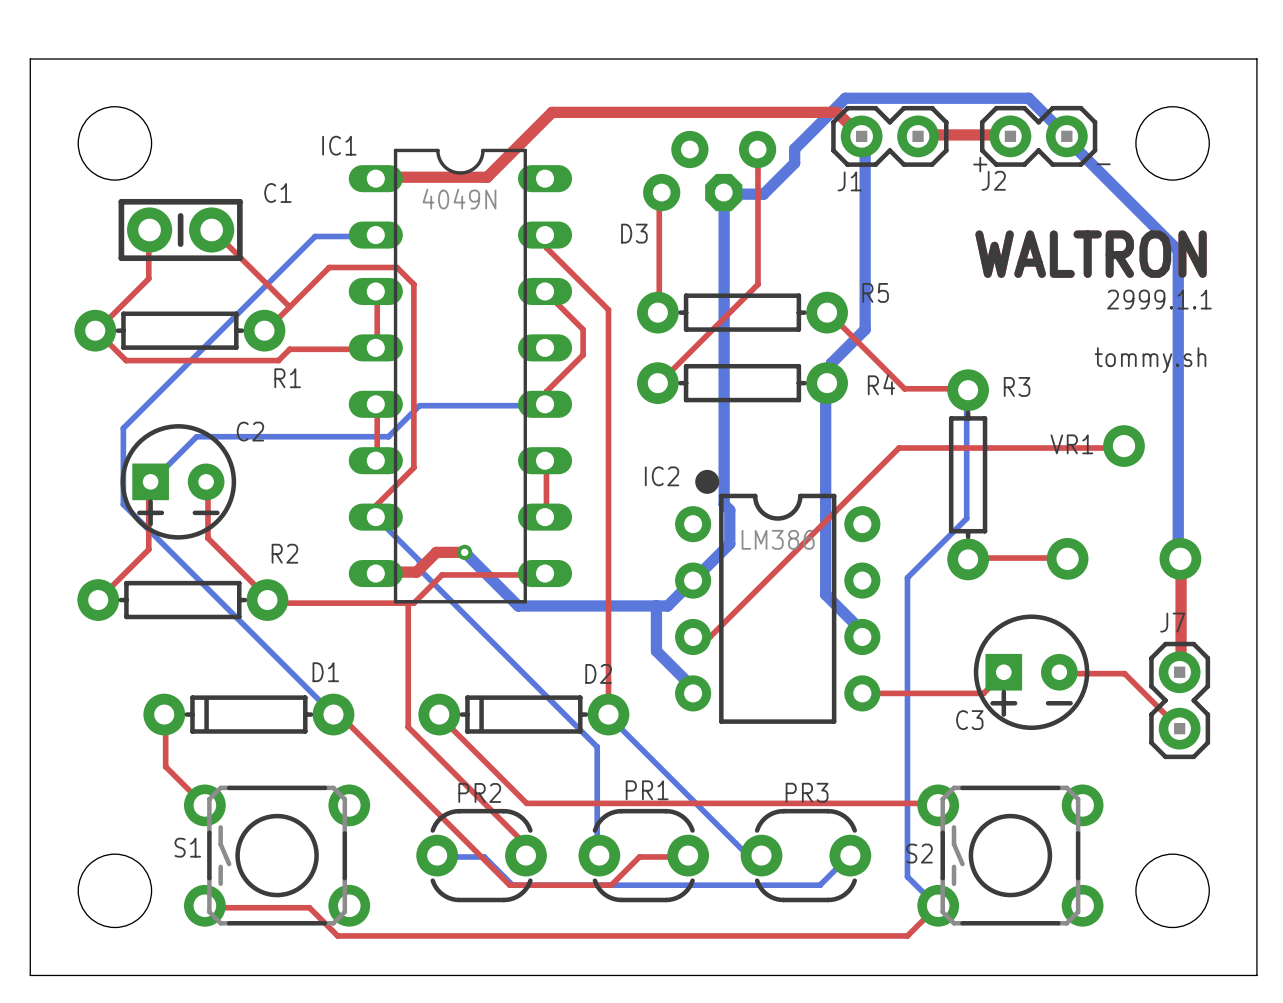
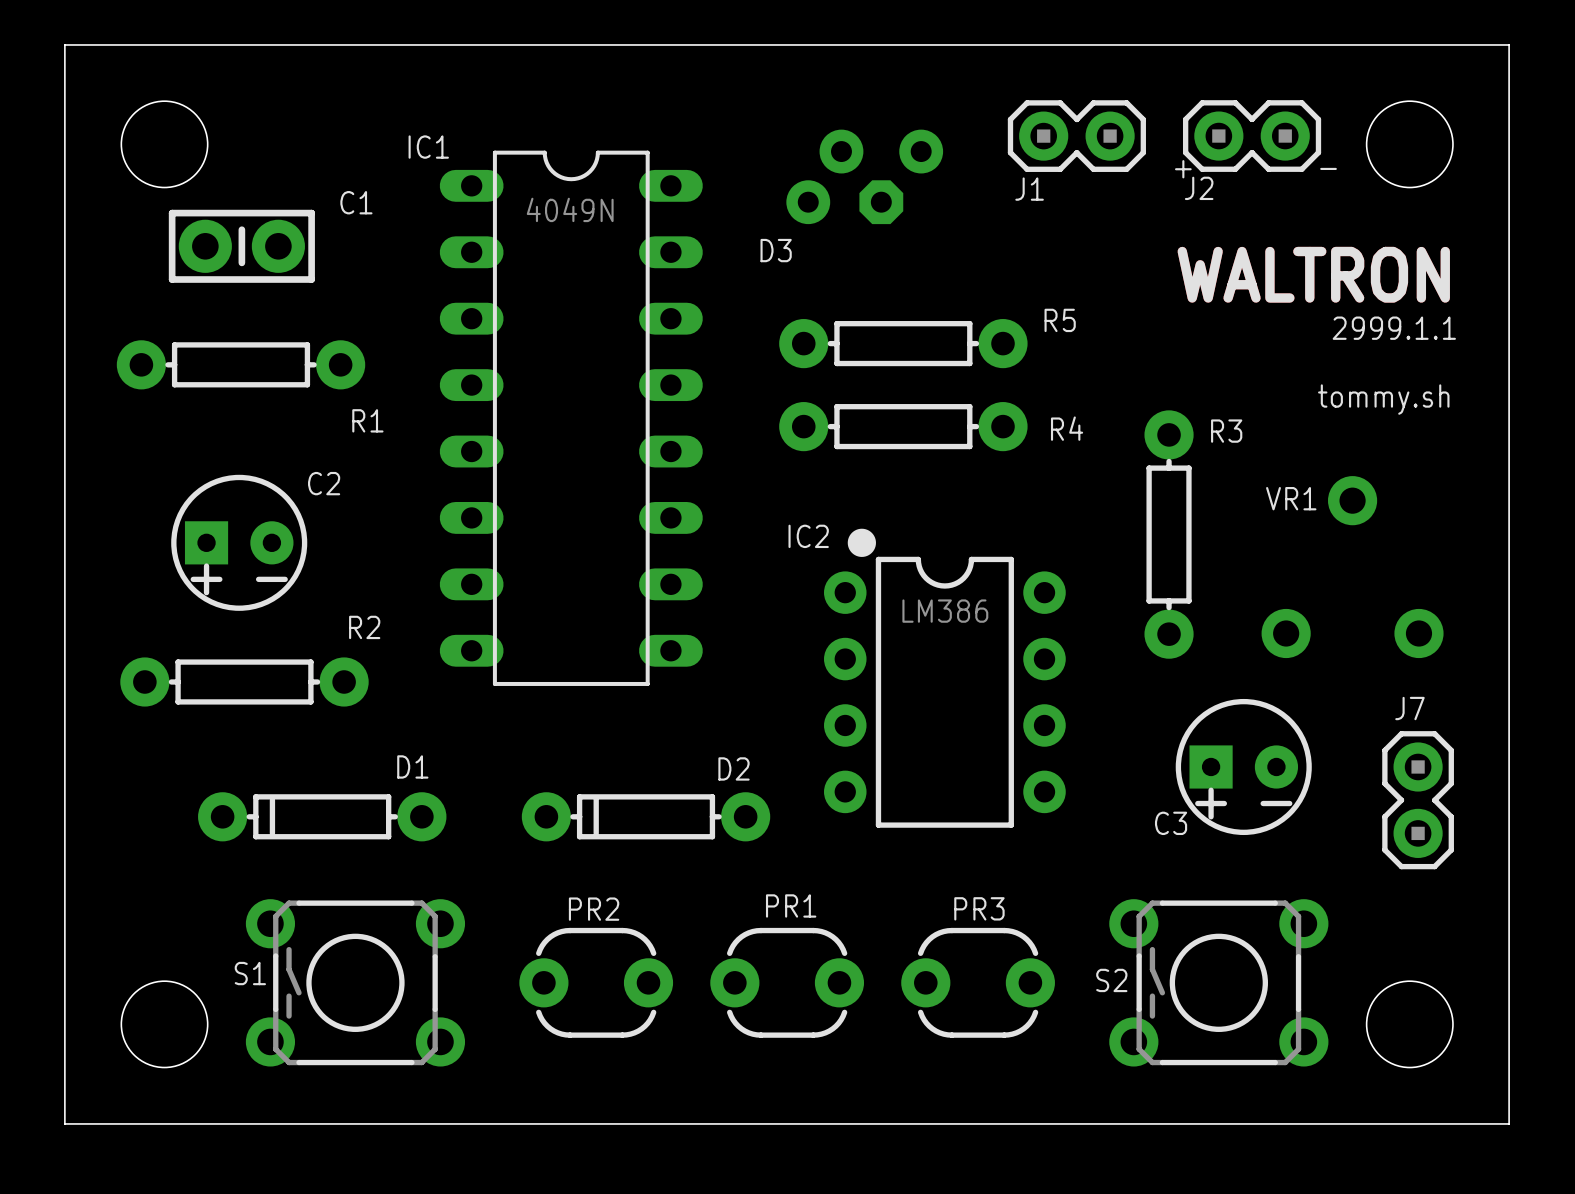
top track: (861, 136) (836, 112) (552, 112) (487, 177) (375, 178) -> none
bottom track: (861, 136) (865, 140) (865, 329) (831, 363) (831, 380) (825, 383) (825, 594) (862, 631) (862, 636) -> none
top track: (918, 136) (1010, 136) -> none
top track: (757, 149) (757, 284) (657, 383) -> none
top track: (661, 192) (659, 194) (657, 312) -> none
top track: (149, 230) (148, 278) (95, 330) (126, 360) (278, 360) (289, 349) (374, 349) (377, 346) (375, 291) -> none
top track: (211, 230) (289, 306) -> none
bottom track: (375, 235) (315, 236) (123, 428) (123, 504) (333, 714) -> none
top track: (545, 235) (546, 247) (608, 309) (608, 714) -> none
top track: (545, 291) (583, 329) (583, 354) (546, 391) (545, 404) -> none
top track: (827, 312) (904, 388) (968, 390) -> none
top track: (264, 330) (329, 267) (396, 267) (413, 284) (413, 467) (377, 504) (375, 517) -> none
bottom track: (968, 390) (966, 518) (907, 577) (907, 876) (938, 905) -> none
top track: (375, 404) (375, 460) -> none
bottom track: (545, 404) (419, 405) (388, 436) (196, 436) (150, 481) -> none
top track: (1123, 446) (1121, 448) (899, 448) (710, 636) (693, 636) -> none
top track: (545, 460) (545, 517) -> none
top track: (150, 481) (148, 481) (148, 549) (98, 600) -> none
top track: (206, 481) (207, 481) (207, 538) (267, 597) (267, 600) (272, 603) (413, 603) (442, 574) (545, 573) -> none
bottom track: (375, 517) (419, 560) (419, 569) (597, 746) (597, 854) (599, 855) -> none
top track: (464, 552) (436, 552) (416, 572) (375, 573) -> none
bottom track: (464, 552) (518, 605) (667, 605) (729, 543) (729, 510) (724, 504) (723, 192) (763, 194) (794, 163) (794, 149) (845, 98) (1028, 98) (1178, 250) (1178, 558) (1180, 558) -> none
via: (464, 552) -> none
top track: (1067, 558) (968, 559) -> none
top track: (1180, 558) (1179, 672) -> none
top track: (408, 603) (408, 727) (523, 842) (523, 854) (525, 855) -> none
bottom track: (656, 605) (656, 651) (693, 687) (693, 693) -> none
top track: (1003, 672) (983, 693) (862, 693) -> none
top track: (1059, 672) (1124, 673) (1179, 728) -> none
top track: (164, 714) (165, 766) (204, 805) -> none
top track: (333, 714) (340, 715) (509, 885) (611, 885) (639, 856) (688, 855) -> none
top track: (439, 714) (526, 803) (935, 803) (938, 805) -> none
bottom track: (608, 714) (746, 854) (761, 855) -> none
bottom track: (437, 855) (484, 856) (512, 885) (820, 885) (850, 855) -> none
top track: (204, 905) (205, 907) (309, 907) (337, 935) (907, 935) (938, 905) -> none

